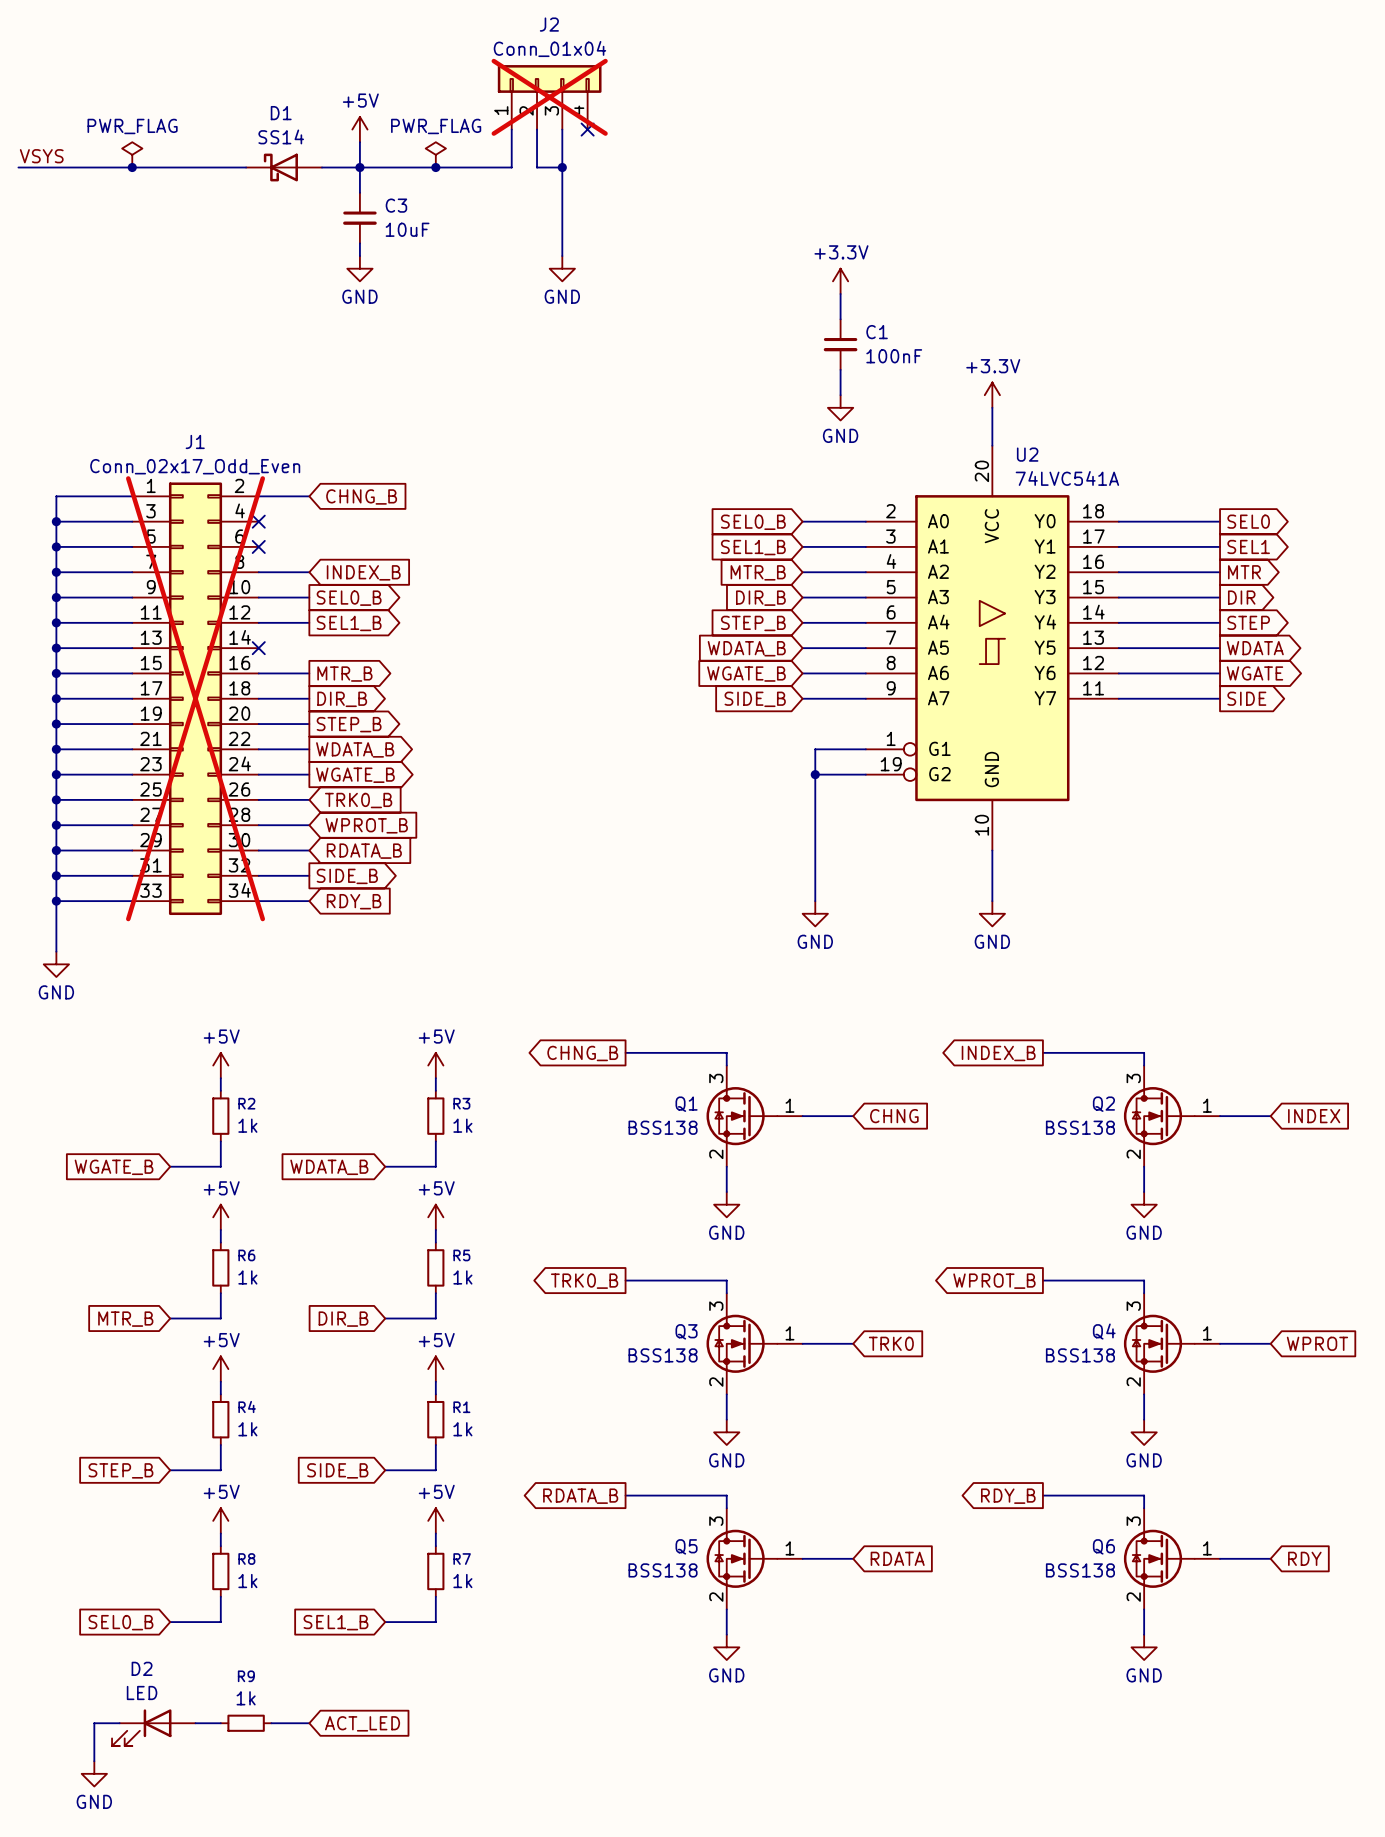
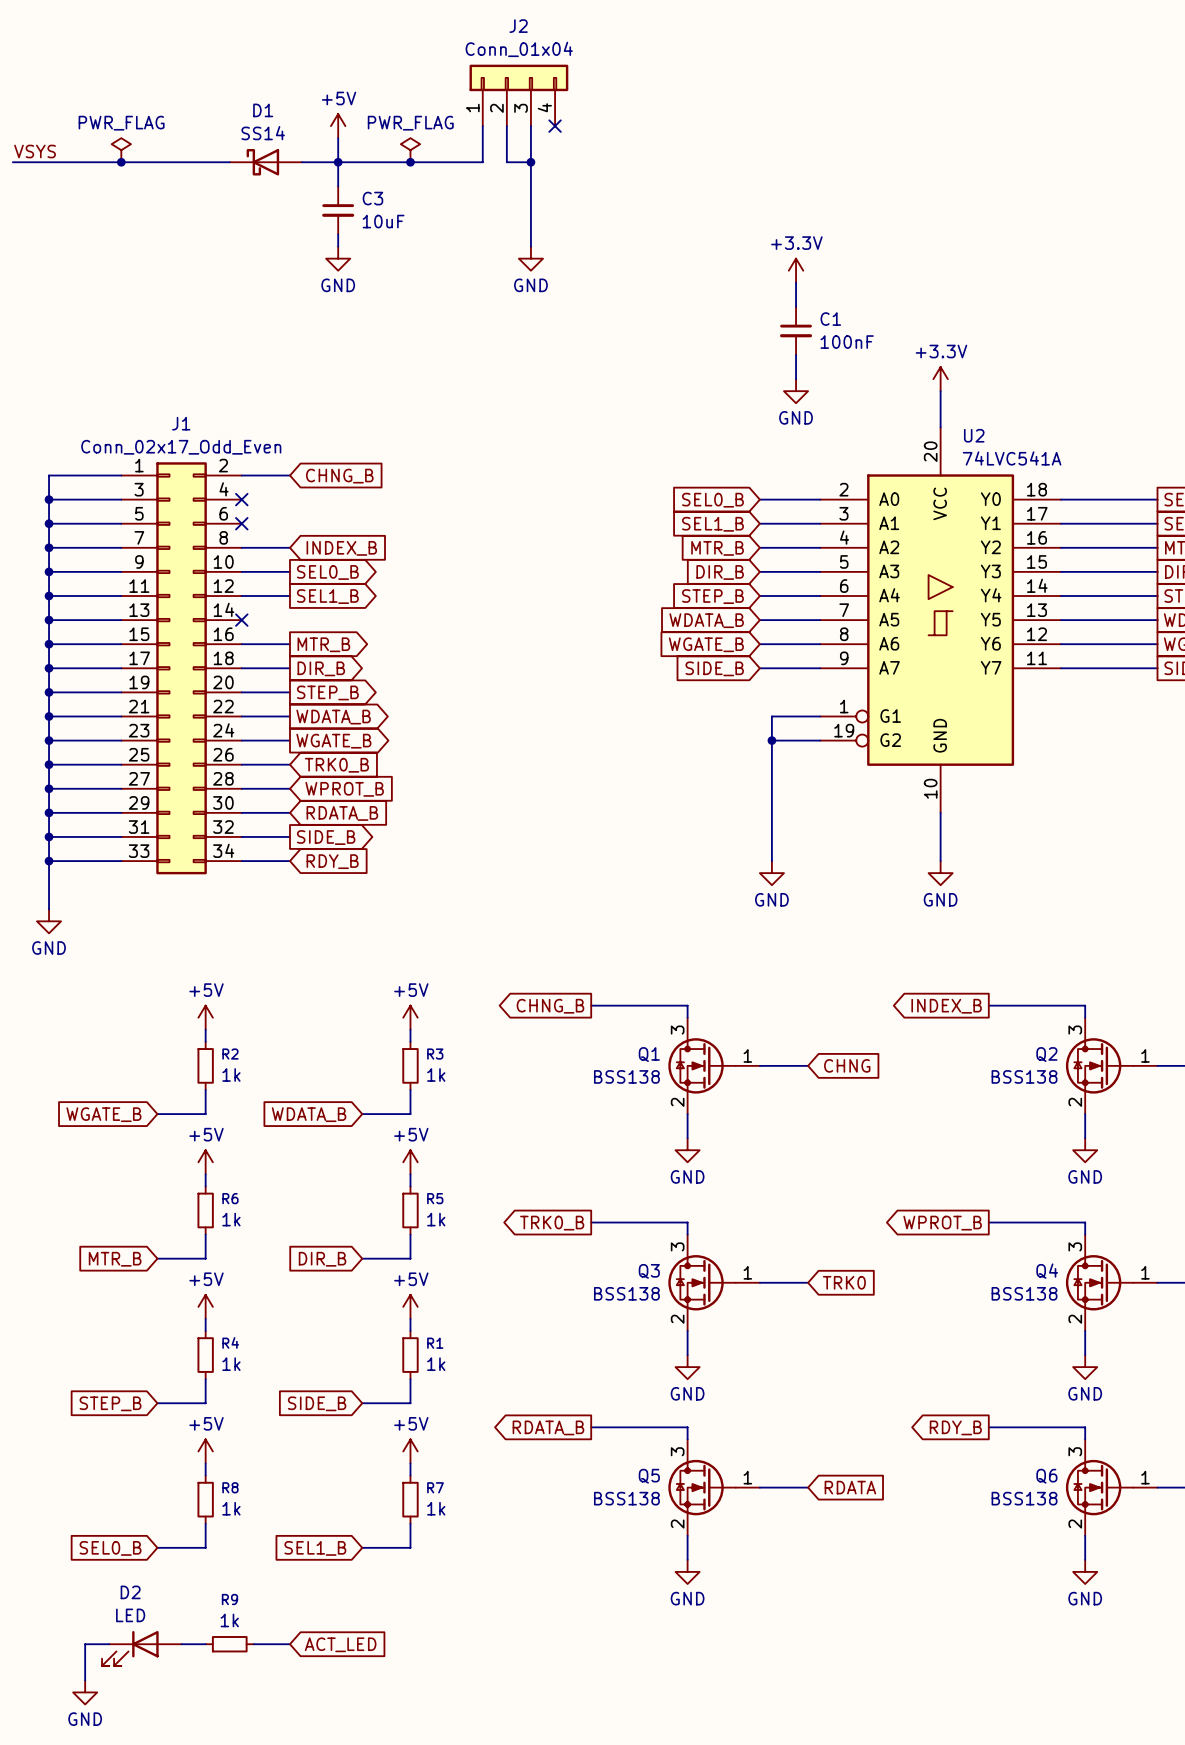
J2 do-not-place cross: (549, 97) -> none
J1 do-not-place cross: (195, 698) -> none

